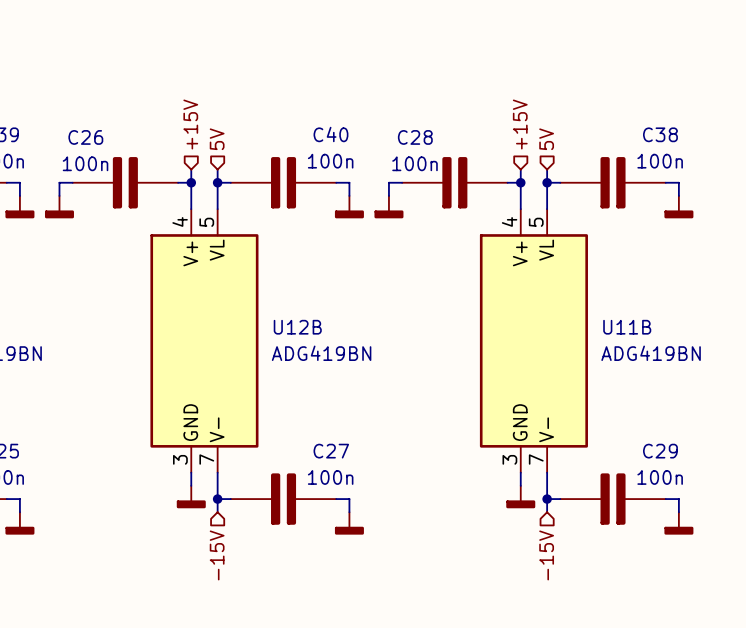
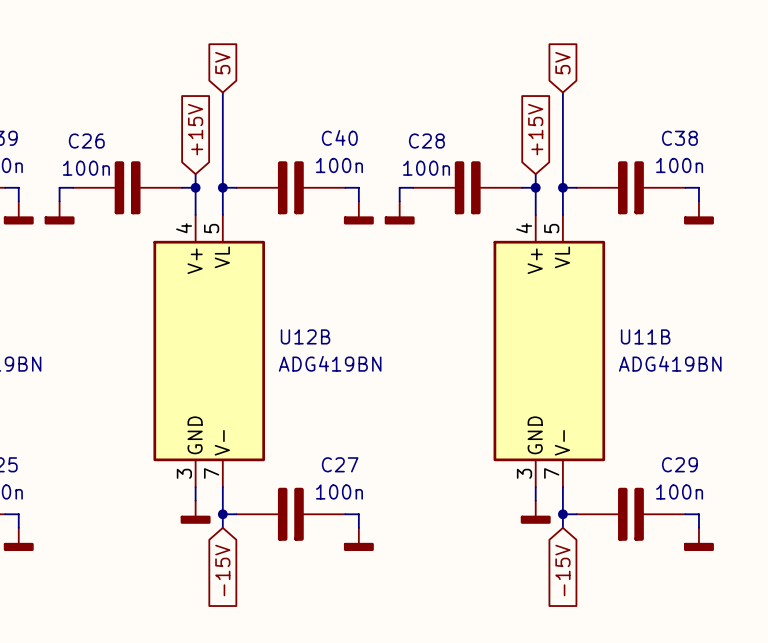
global label: none -> 5V (222, 63)
global label: none -> 5V (562, 63)
wire: none -> (222, 92) (222, 174)
wire: none -> (562, 92) (562, 174)
hierarchical label: +15V (190, 124) -> none
hierarchical label: +15V (520, 124) -> none
global label: none -> +15V (195, 129)
global label: none -> +15V (535, 129)
hierarchical label: 5V (217, 139) -> none
hierarchical label: 5V (546, 139) -> none
global label: none -> -15V (222, 570)
global label: none -> -15V (562, 570)
hierarchical label: -15V (217, 555) -> none
hierarchical label: -15V (546, 555) -> none

